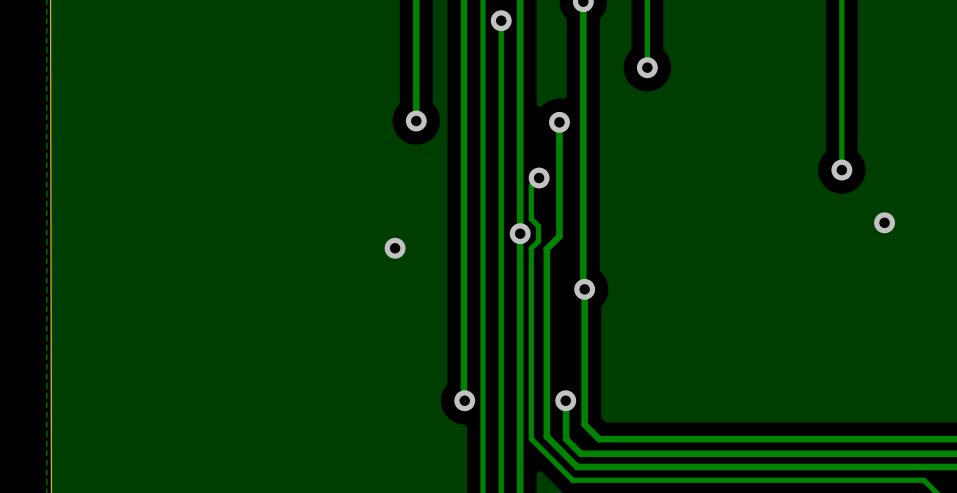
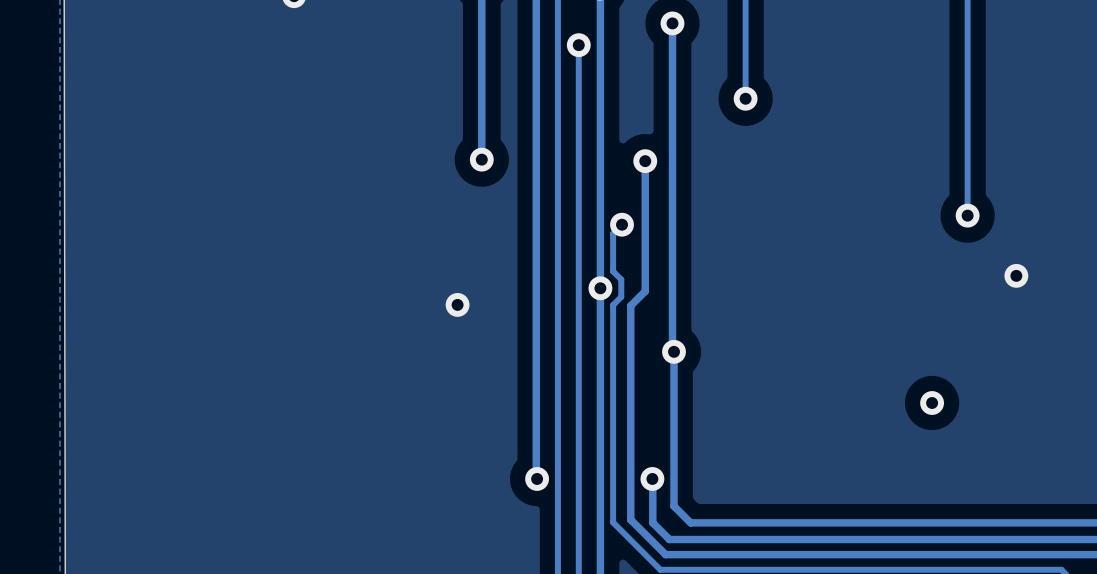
via: none -> (932, 403)

